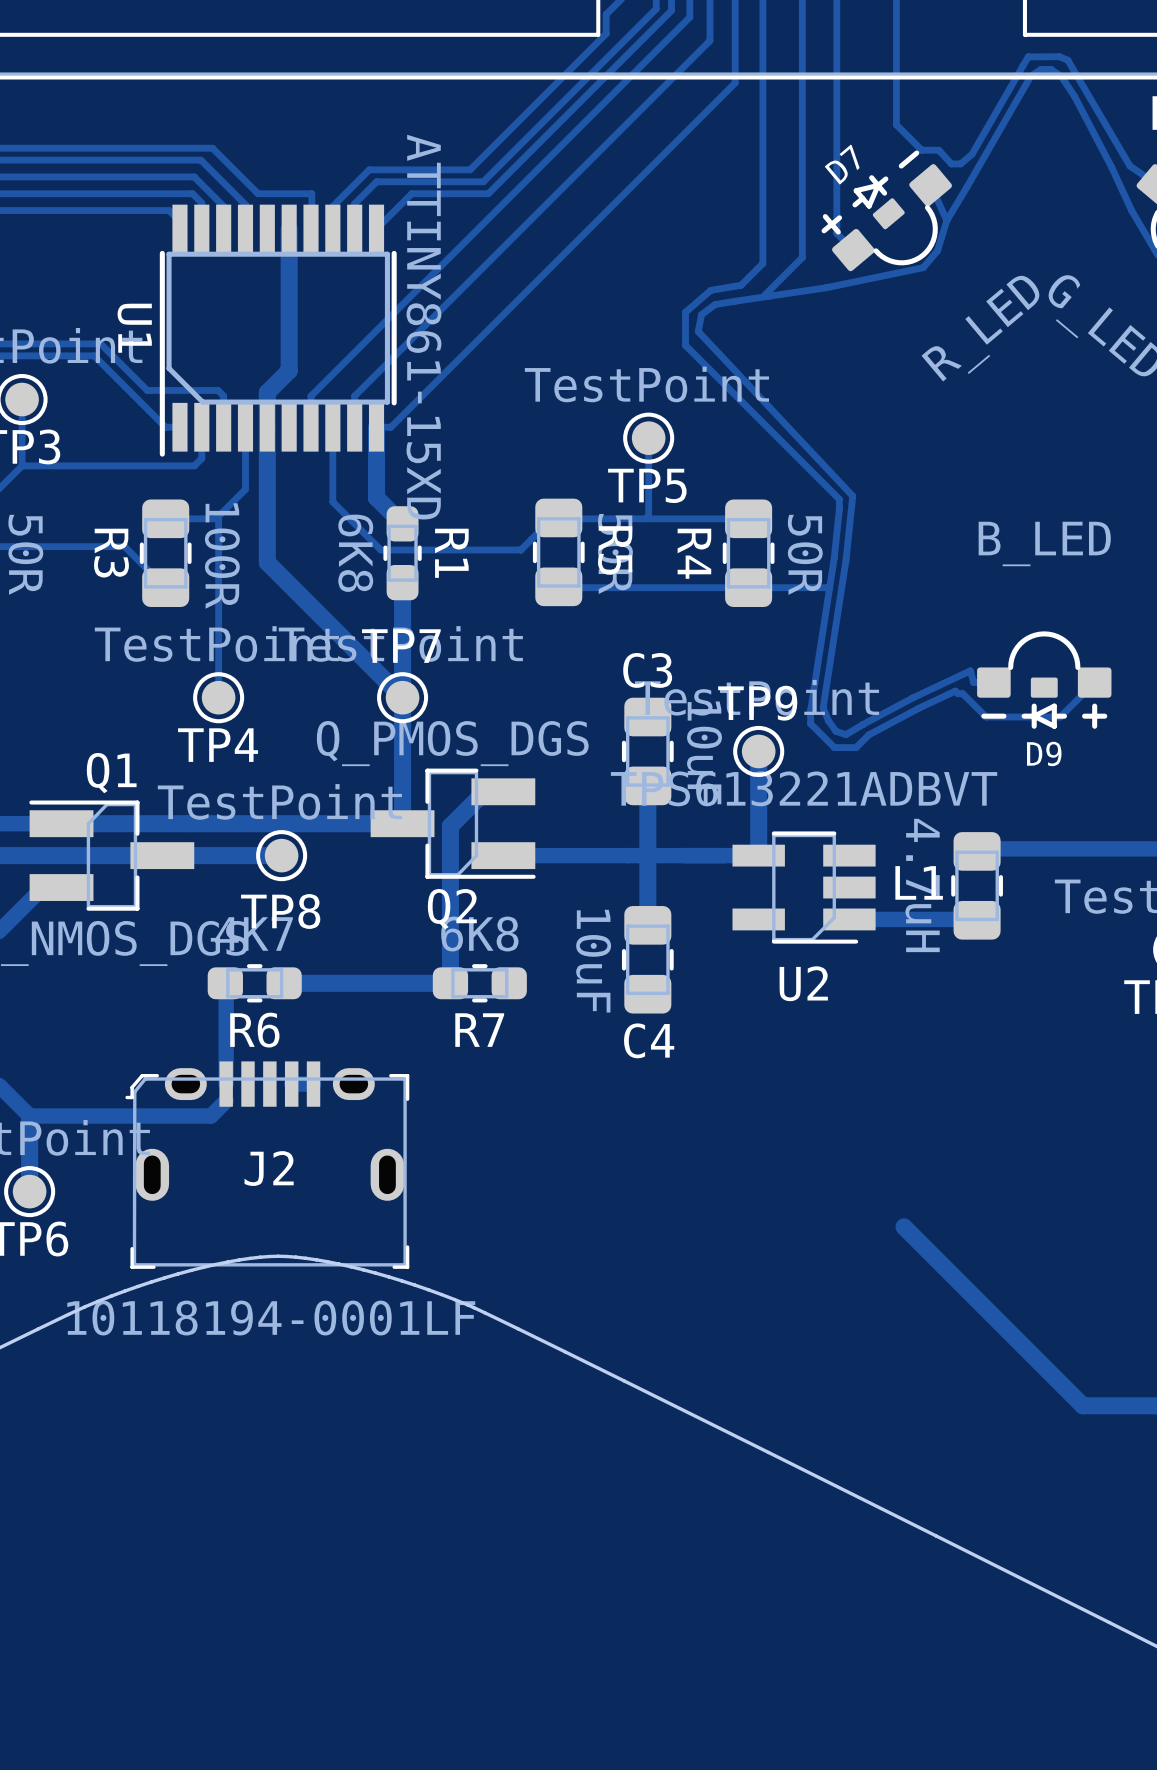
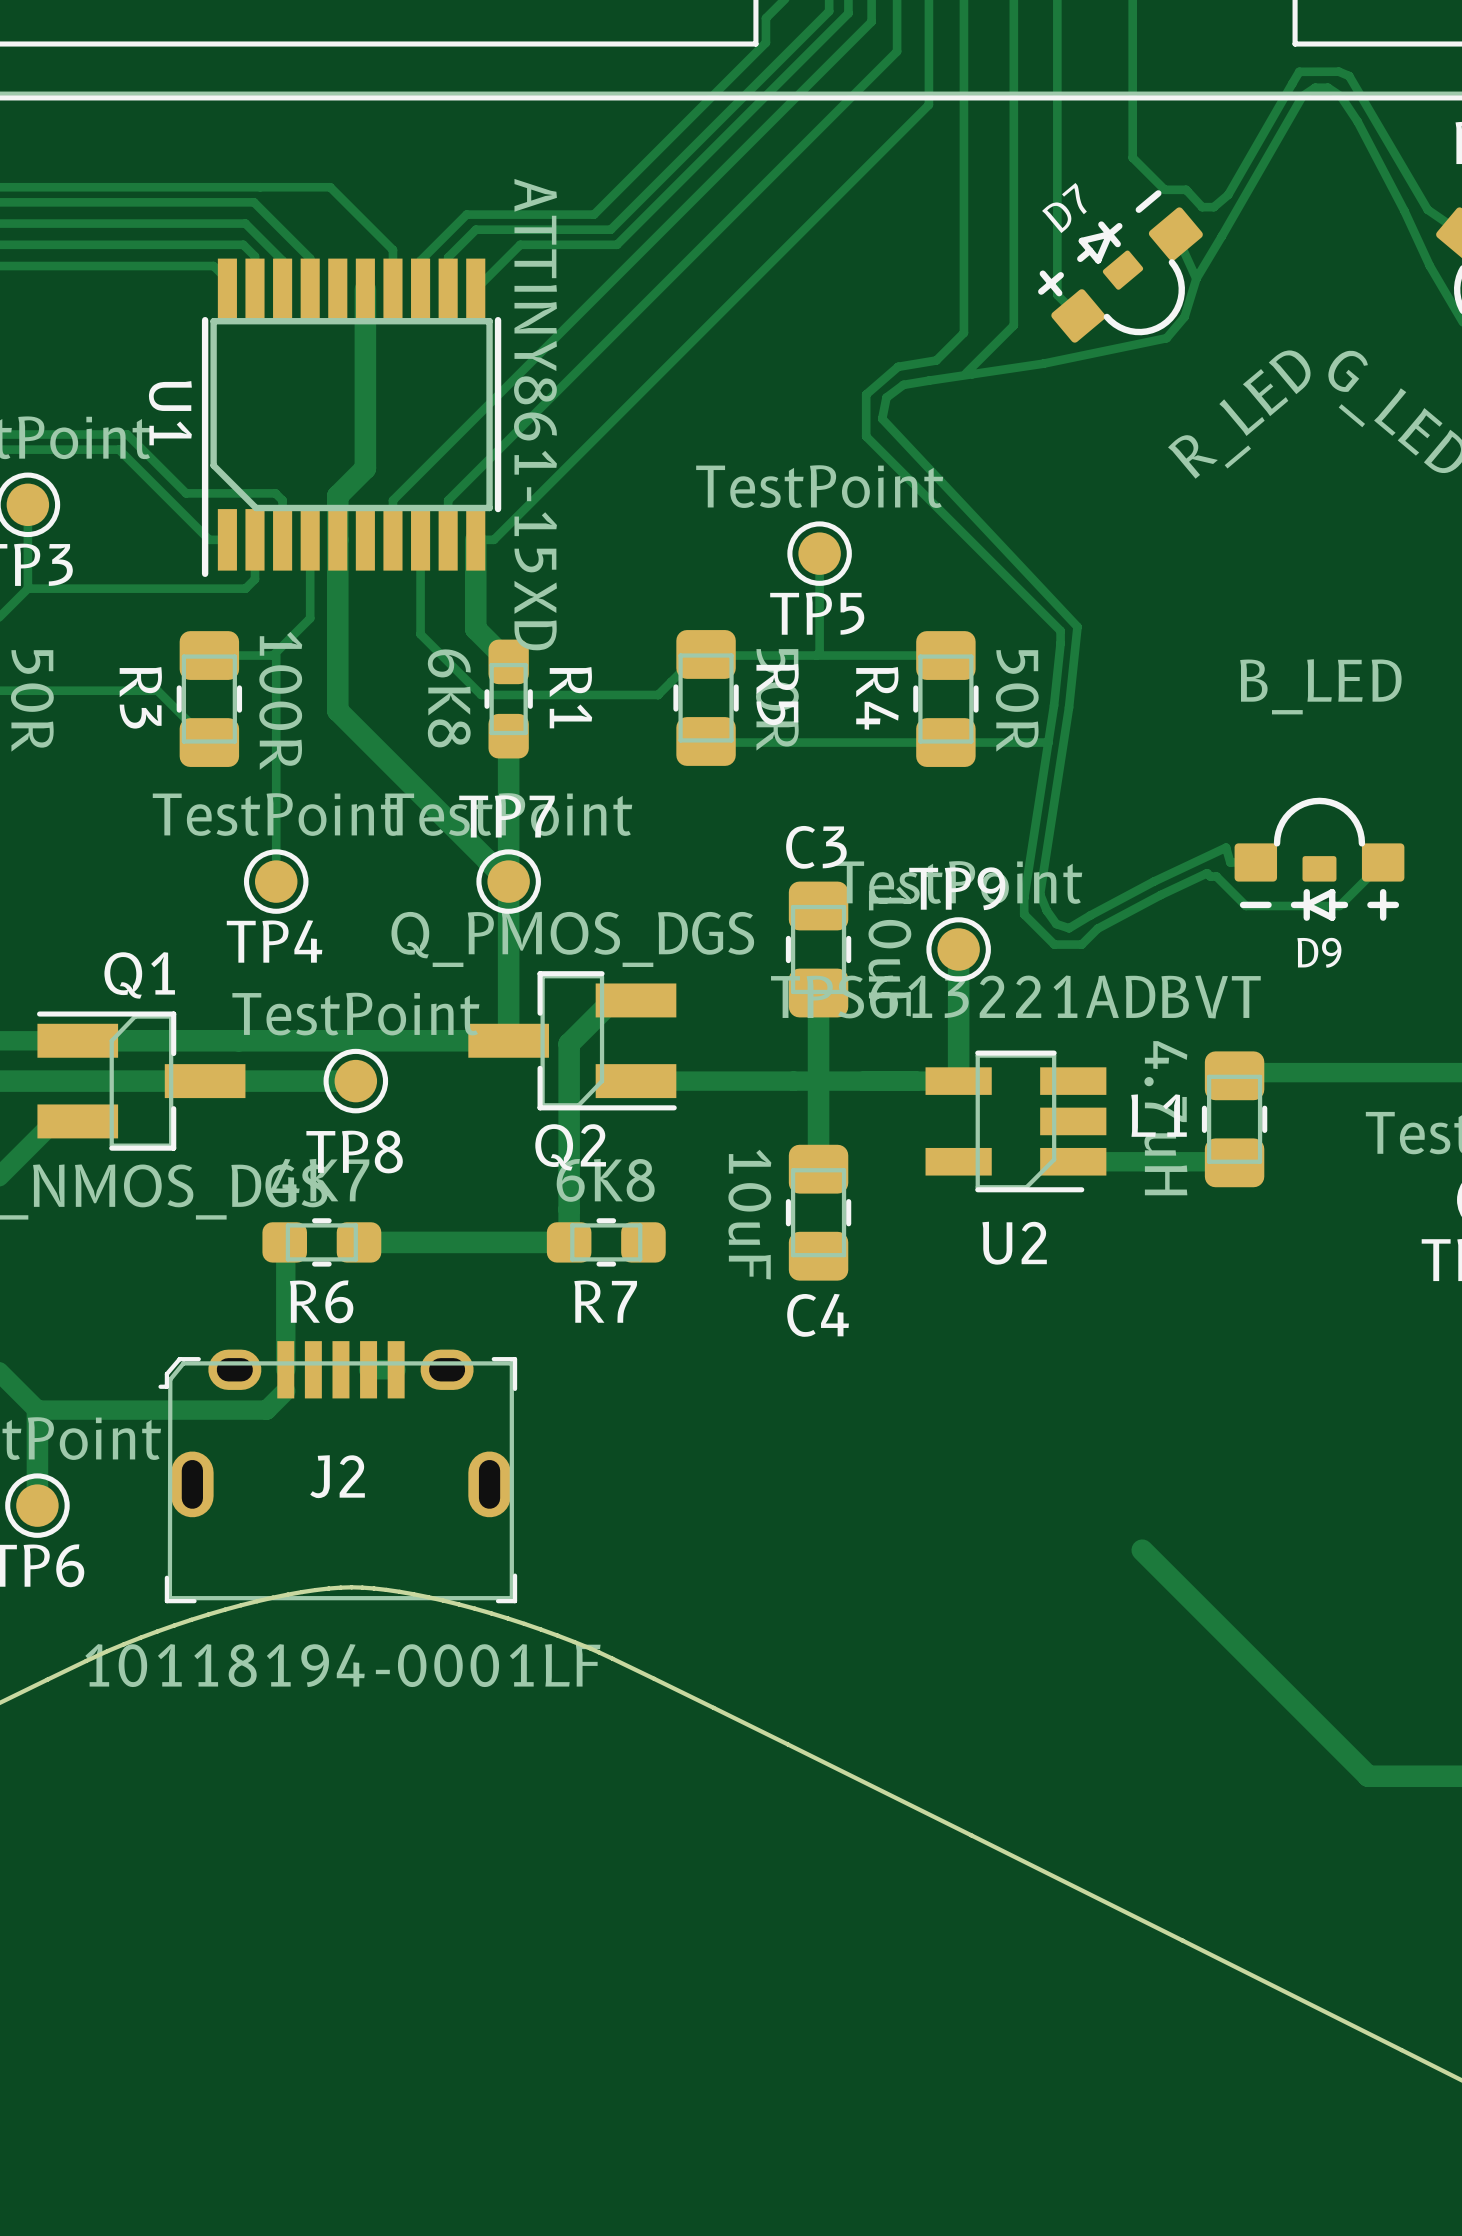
track: (212, 148) (258, 193) (311, 193) (311, 216) -> (268, 187) (330, 187) (392, 249) (392, 289)

